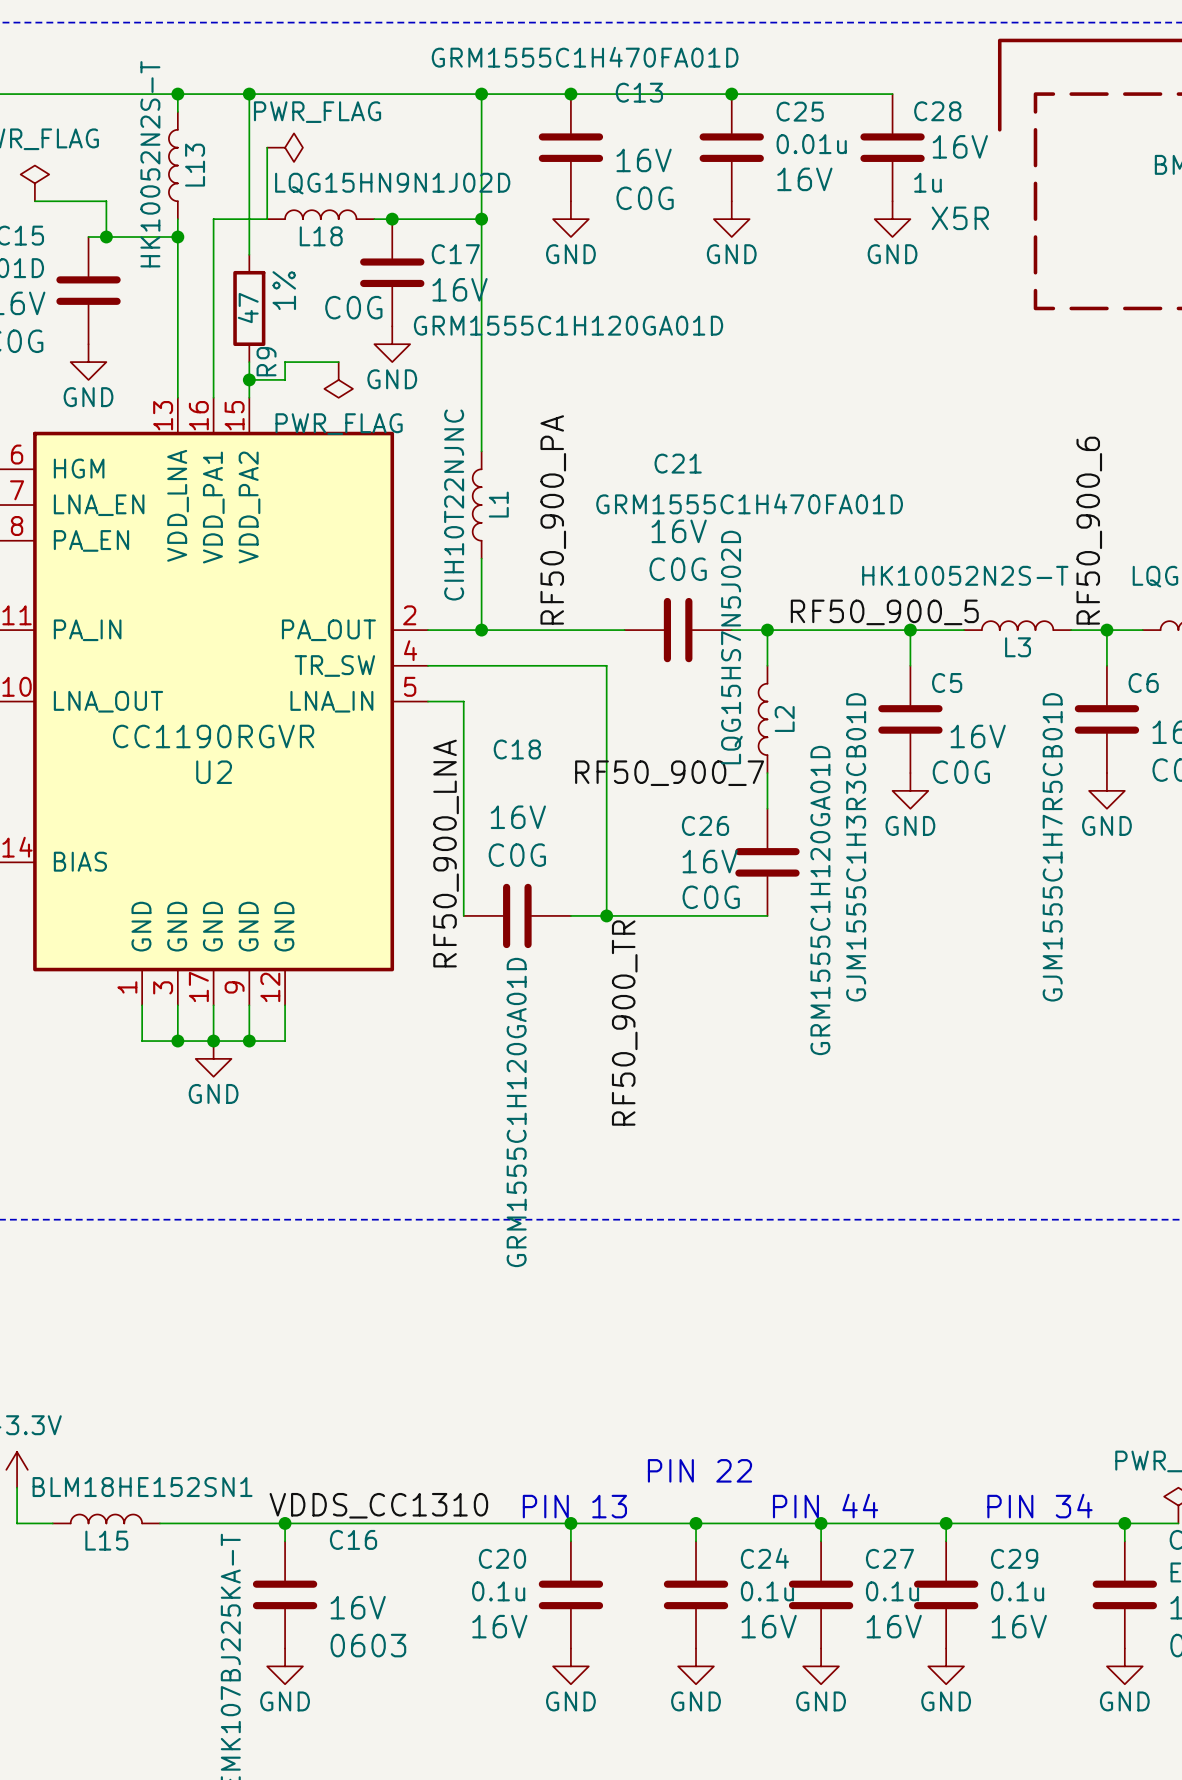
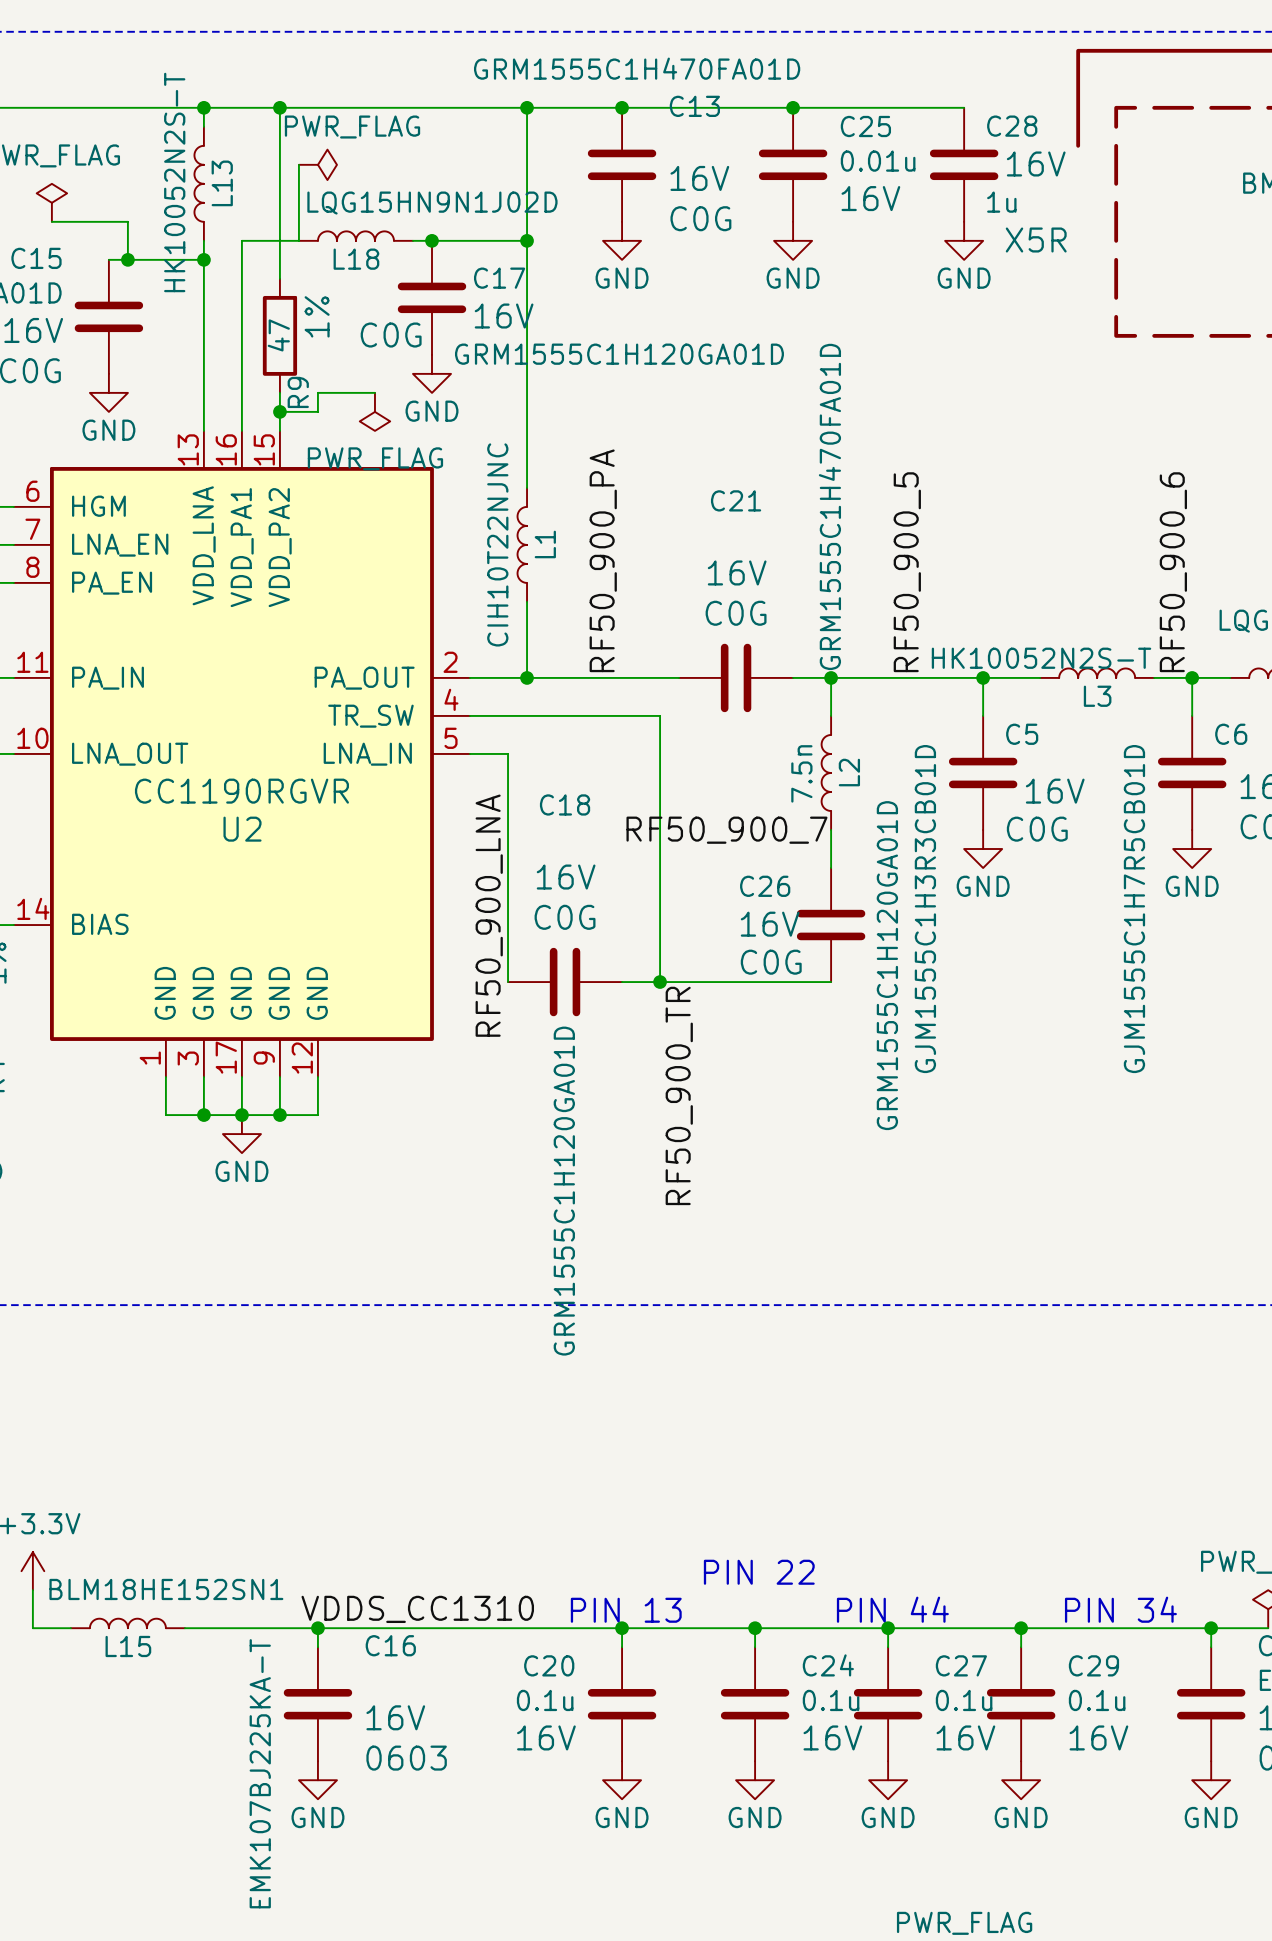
C21 value rotation: 0° (749, 503) -> 90° counterclockwise (829, 506)
L3 value position: HK10052N2S-T (965, 575) -> HK10052N2S-T (1041, 658)
label rotation: 0° (884, 612) -> 90° counterclockwise (907, 572)
L2 value: LQG15HS7N5J02D (731, 647) -> 7.5n (801, 773)

